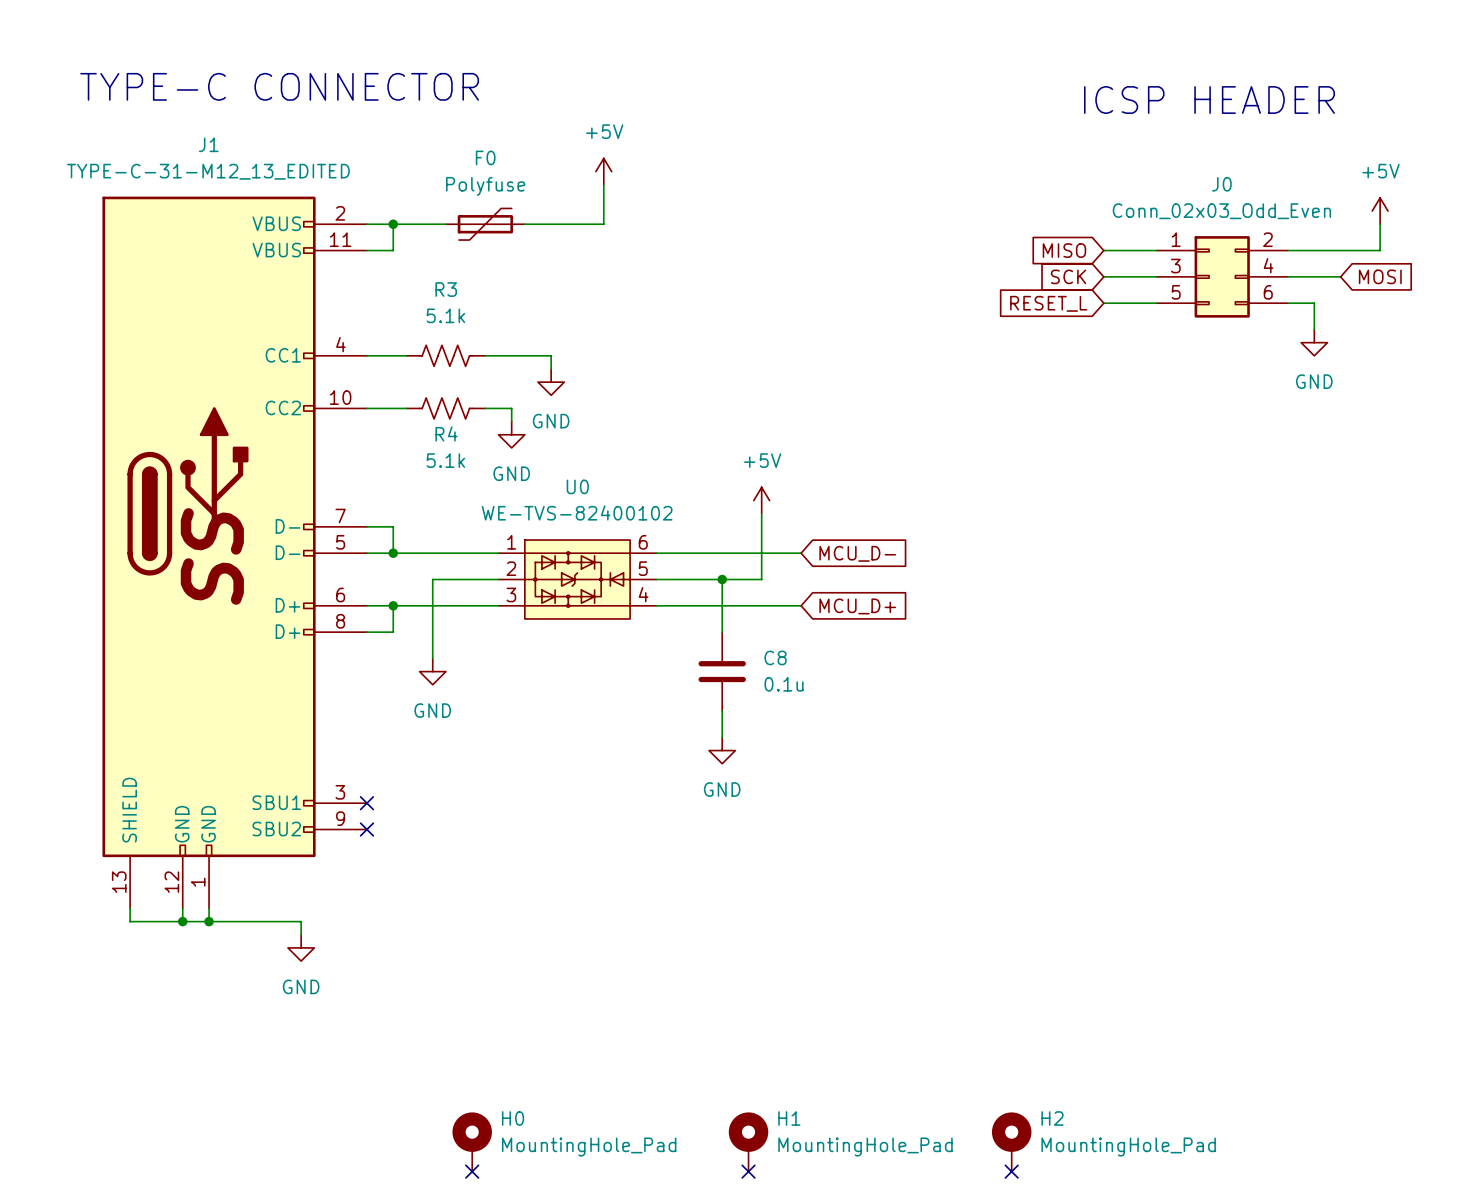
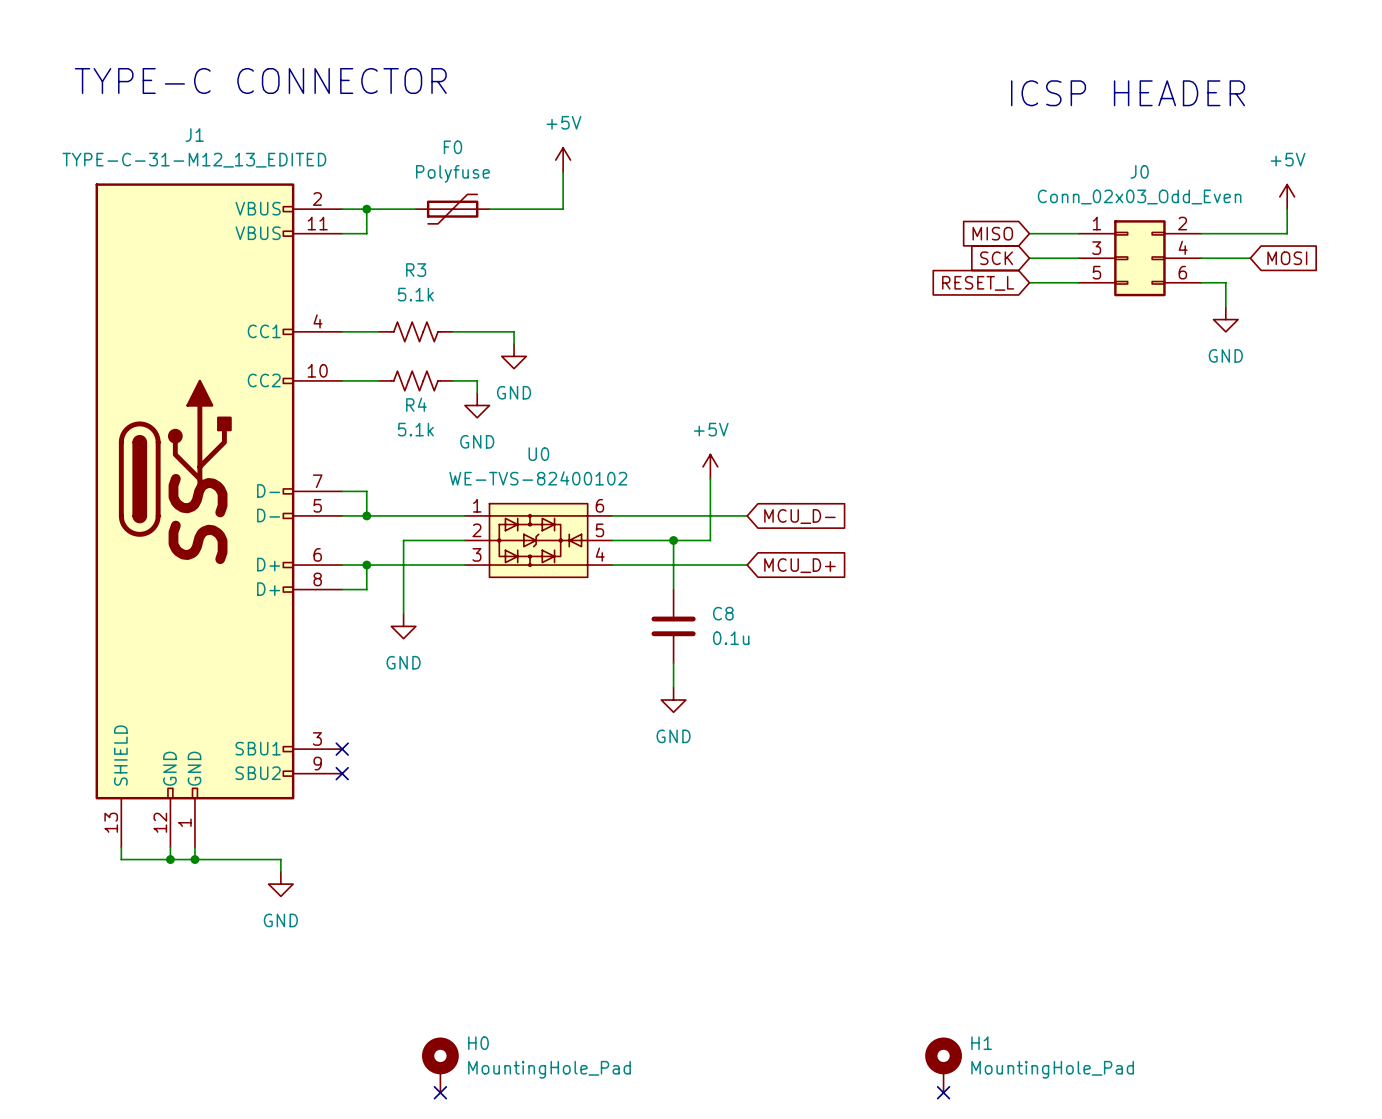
H2 name: H2 (1052, 1118) -> H1 (981, 1043)
H1: MountingHole_Pad (748, 1142) -> none
no-connect mark: (748, 1171) -> none

